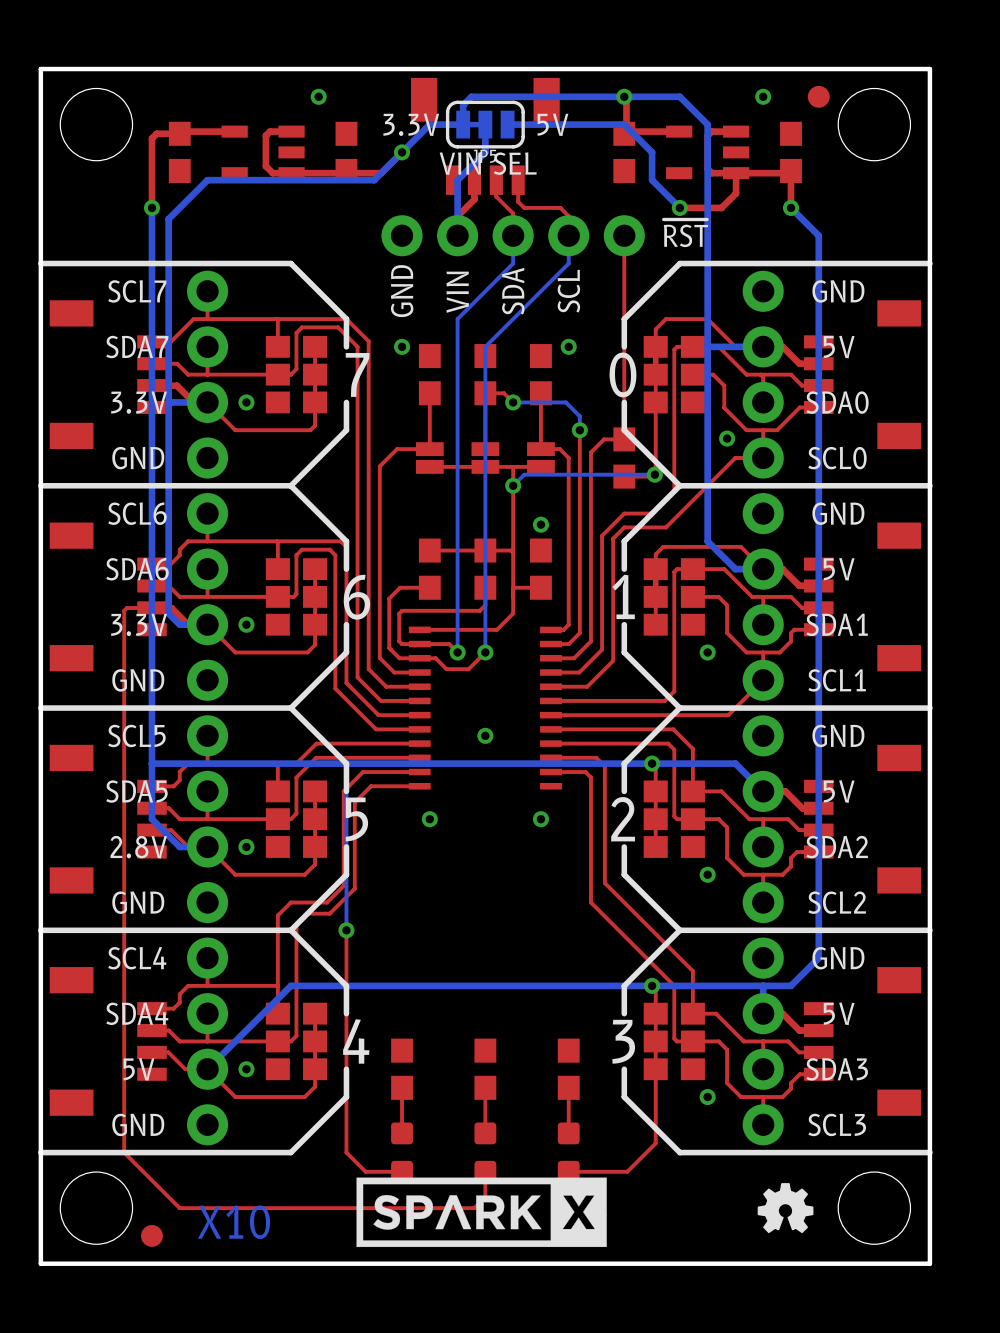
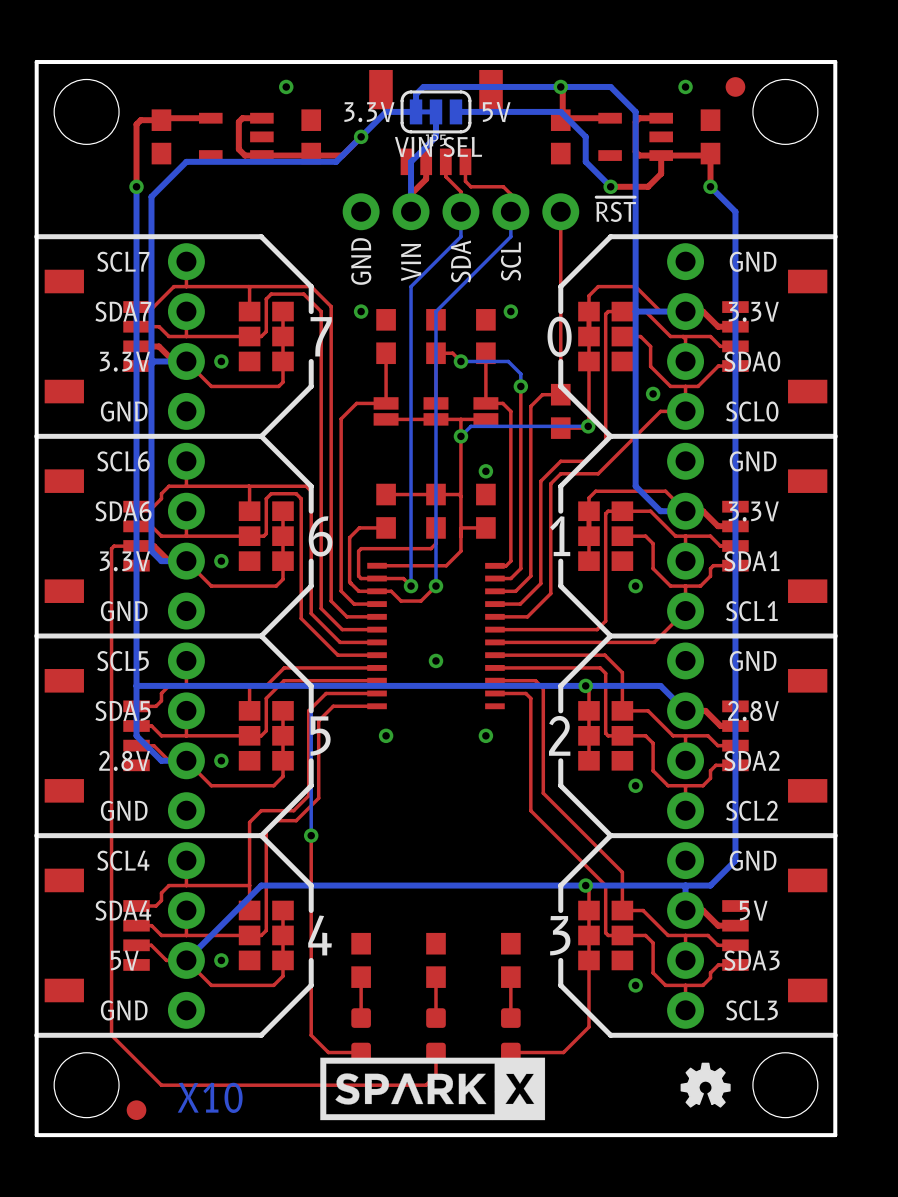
text: 5V (839, 347) -> 3.3V (753, 311)
text: 5V (839, 569) -> 3.3V (753, 511)
text: 5V (839, 791) -> 2.8V (753, 711)

